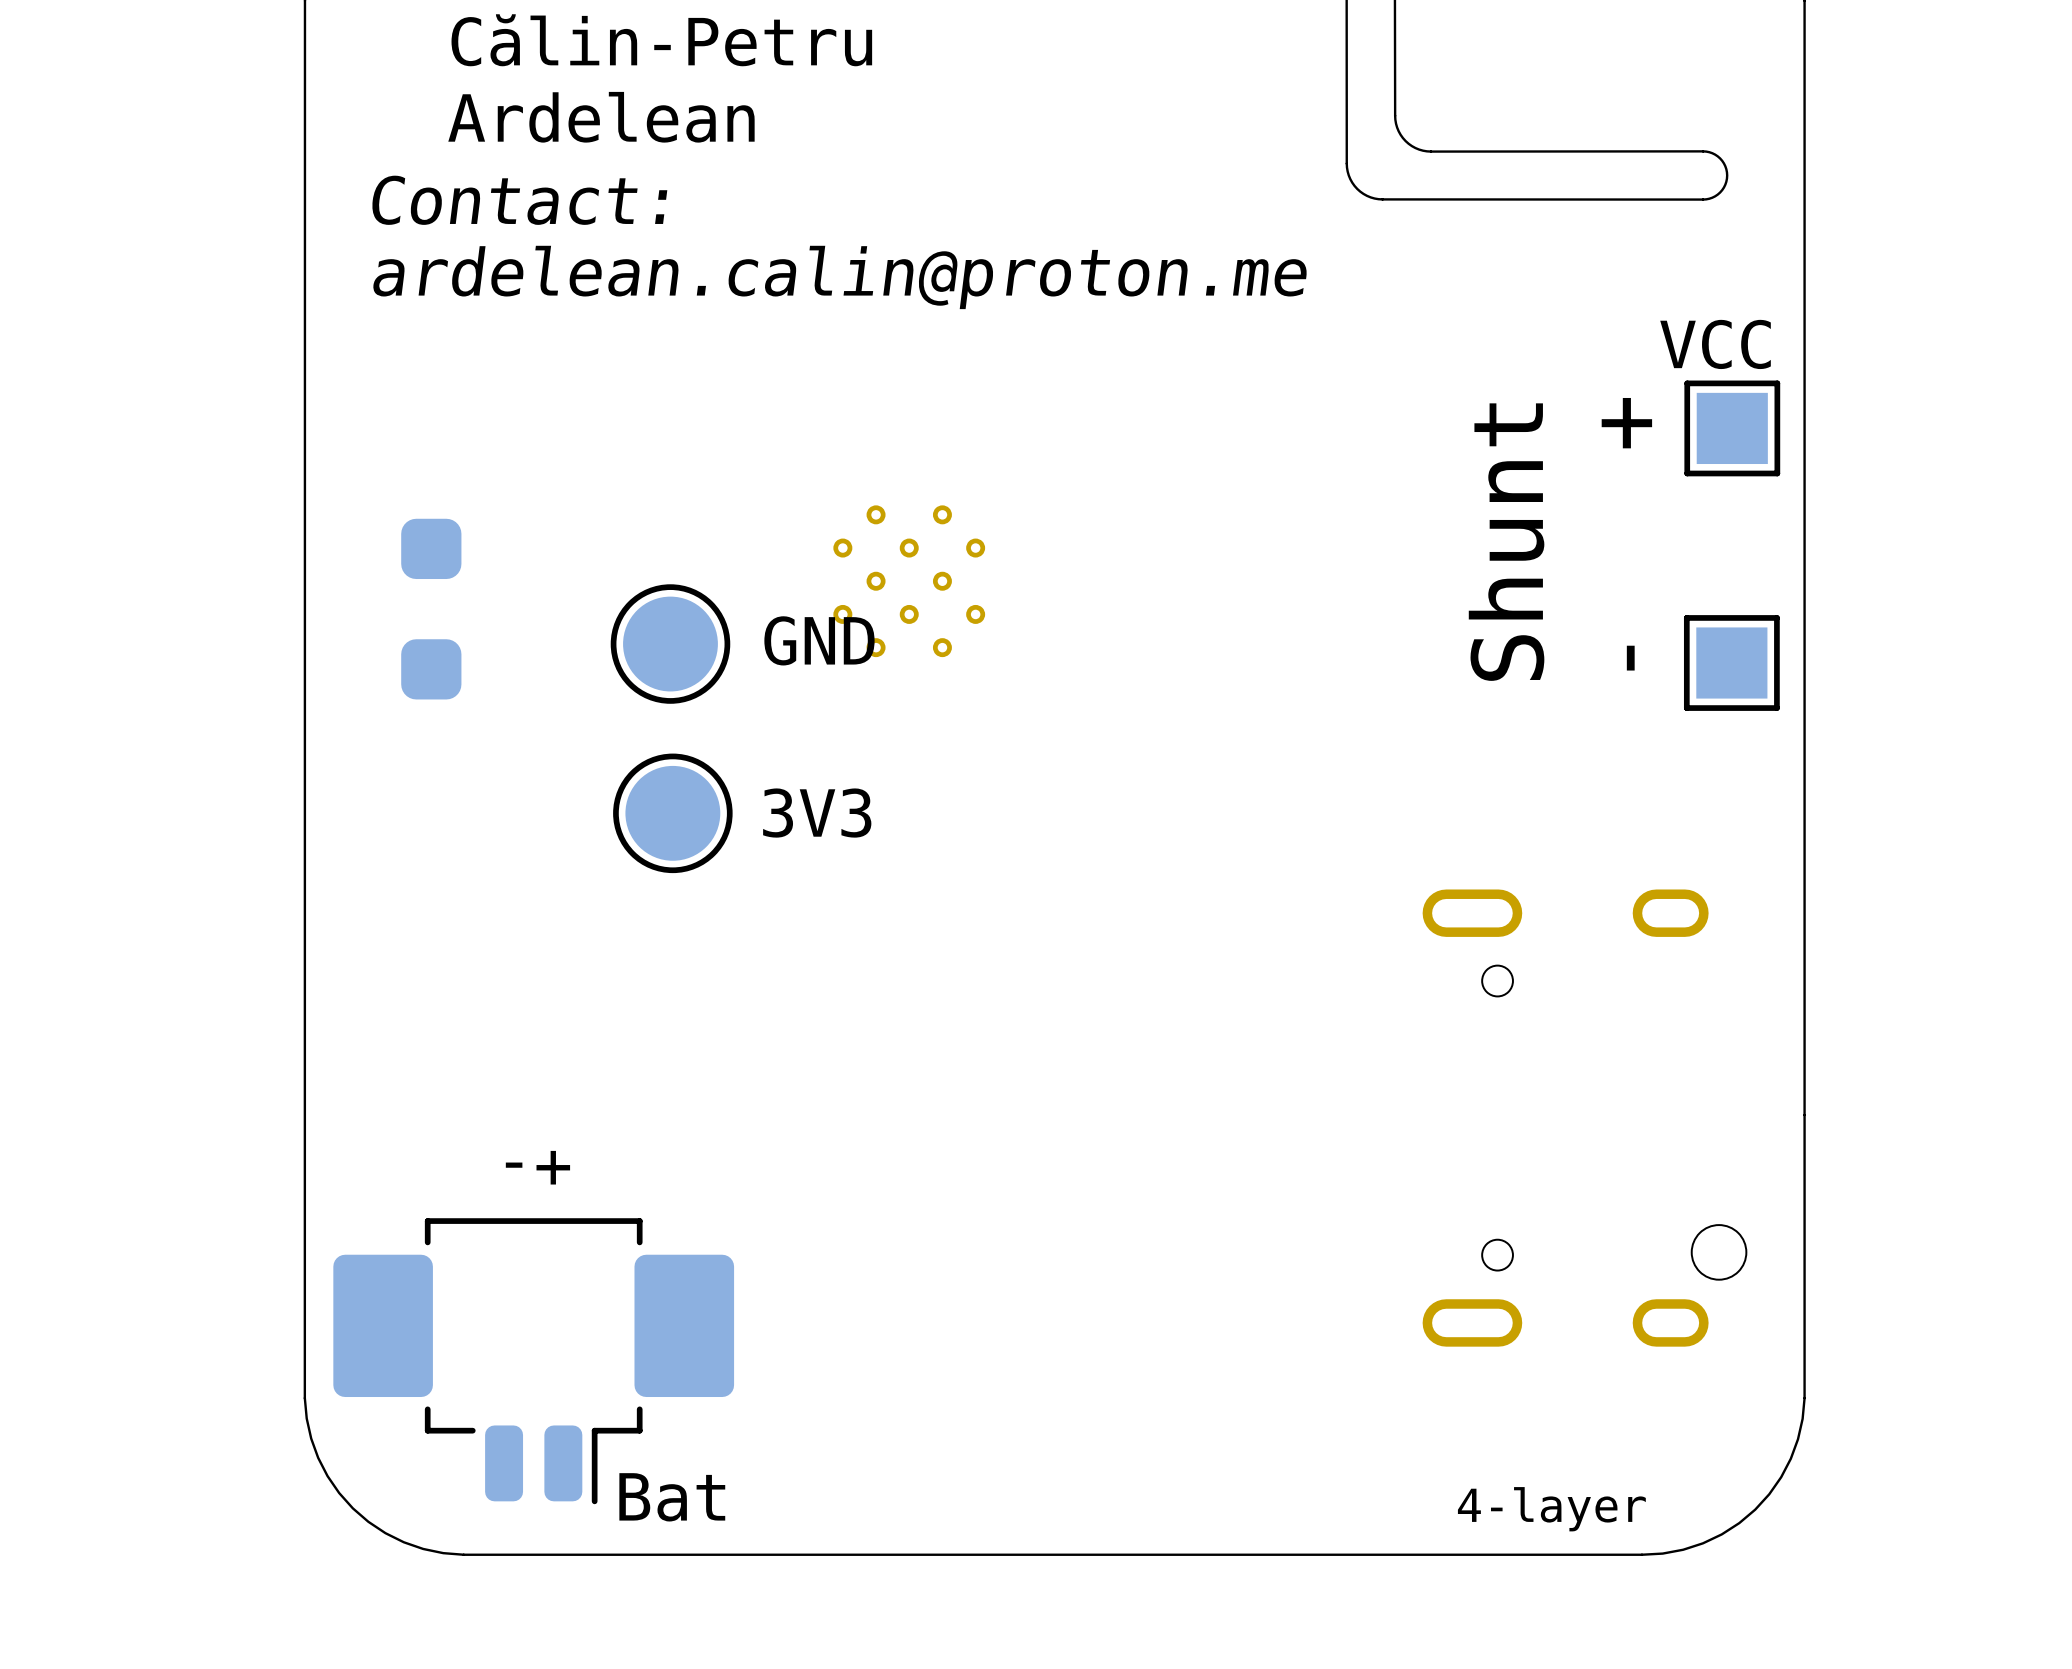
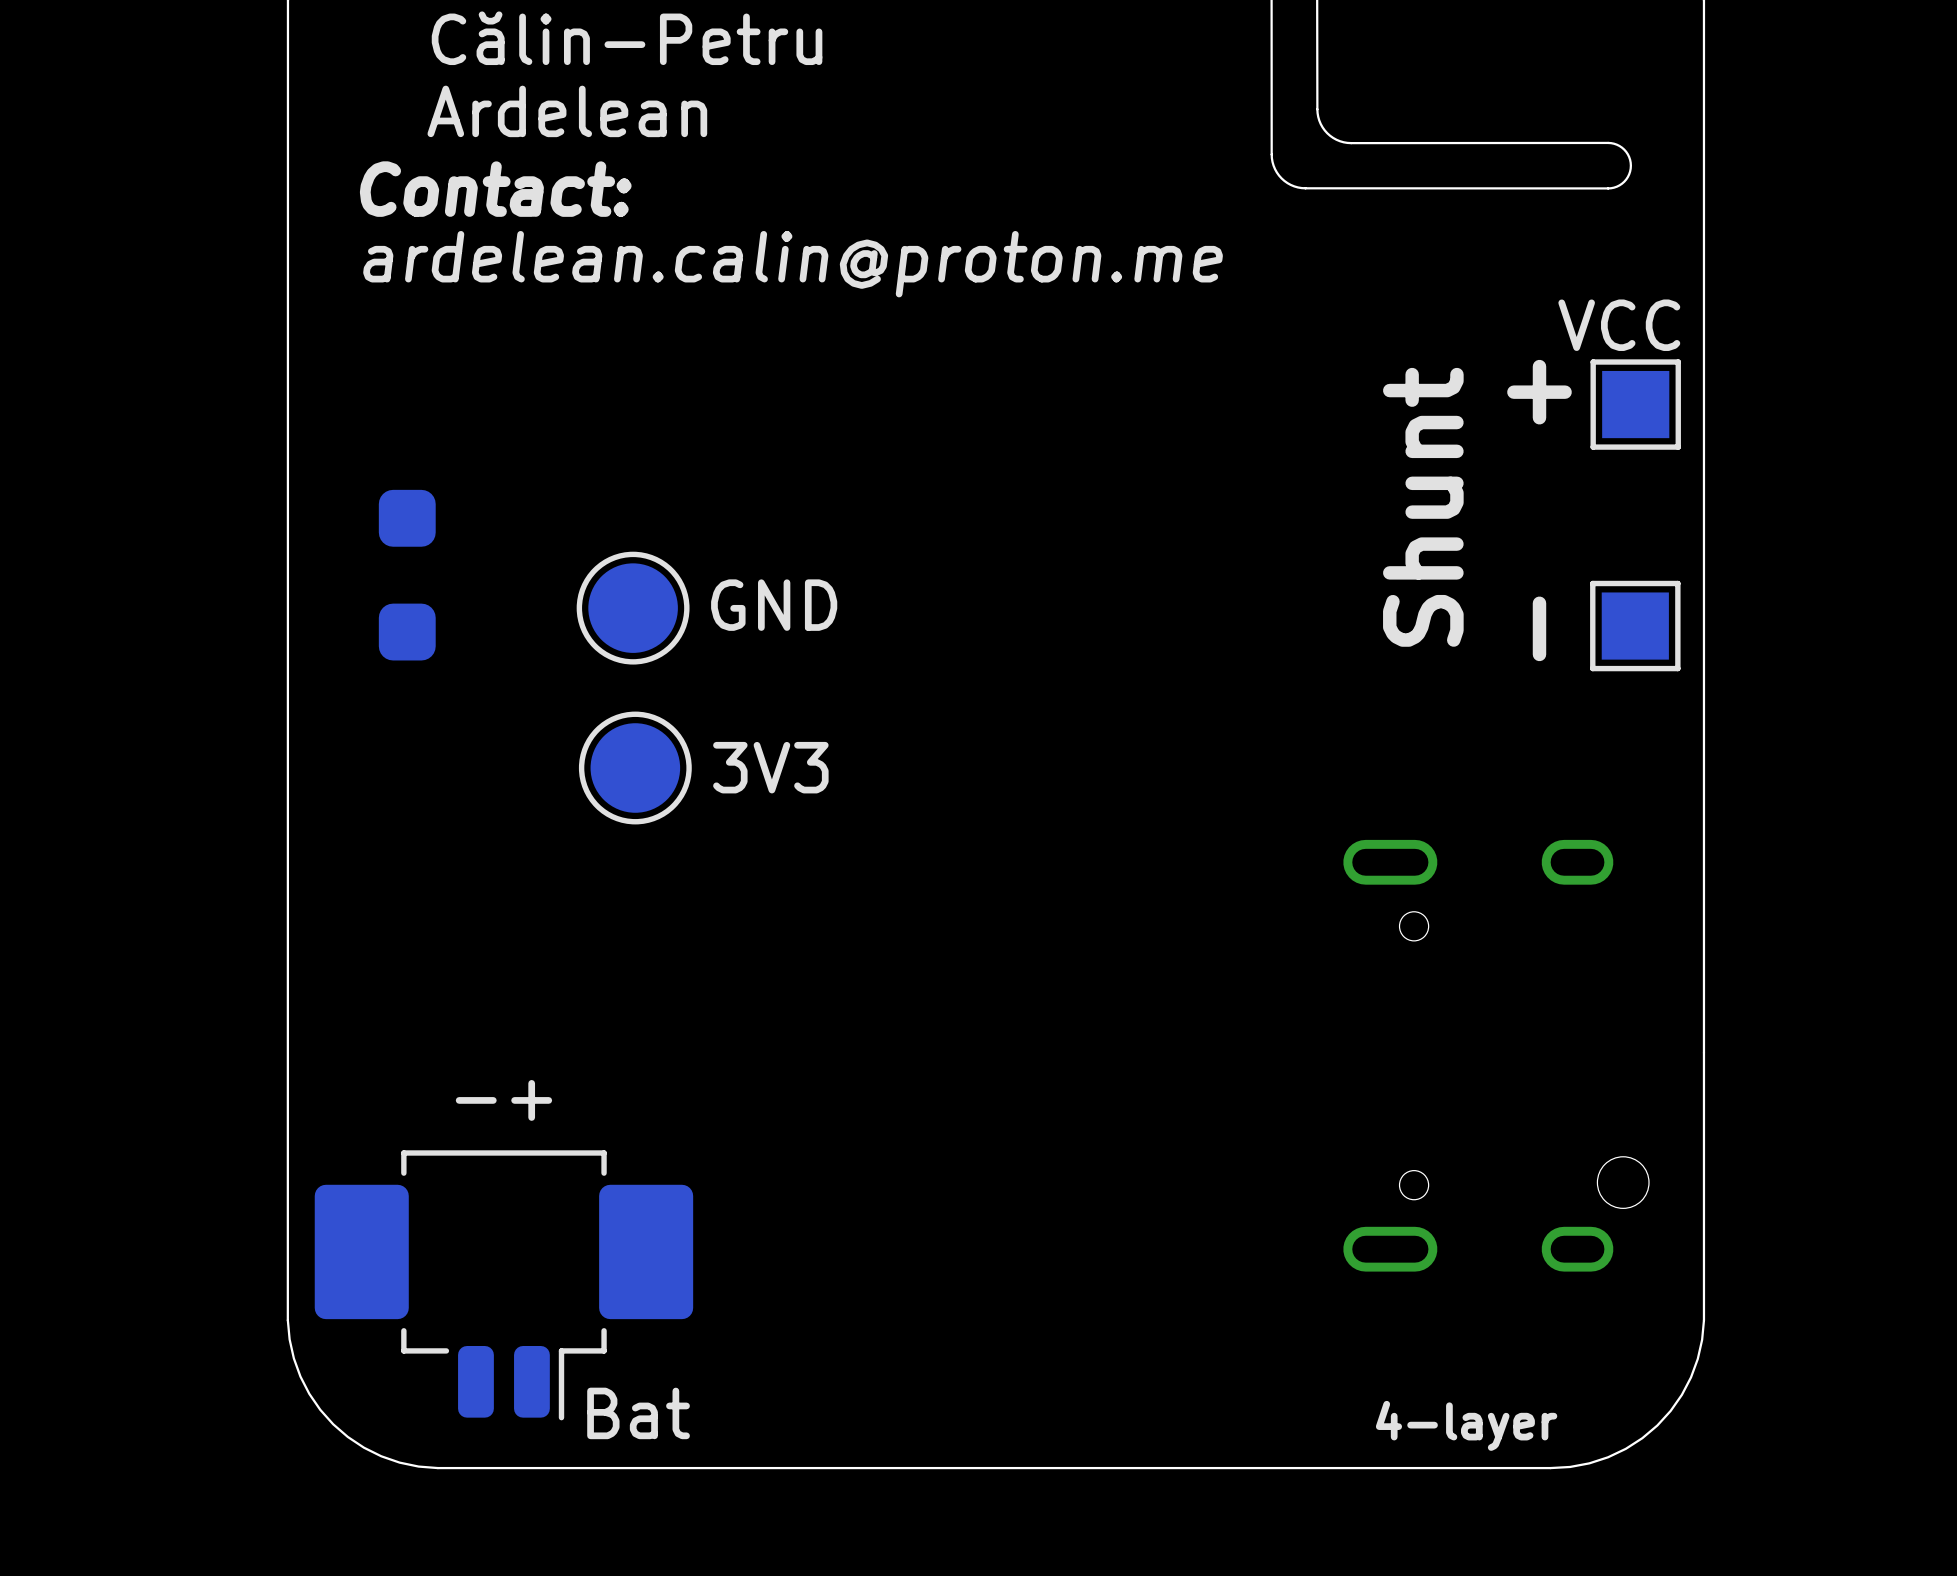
part: (909, 581) -> none

